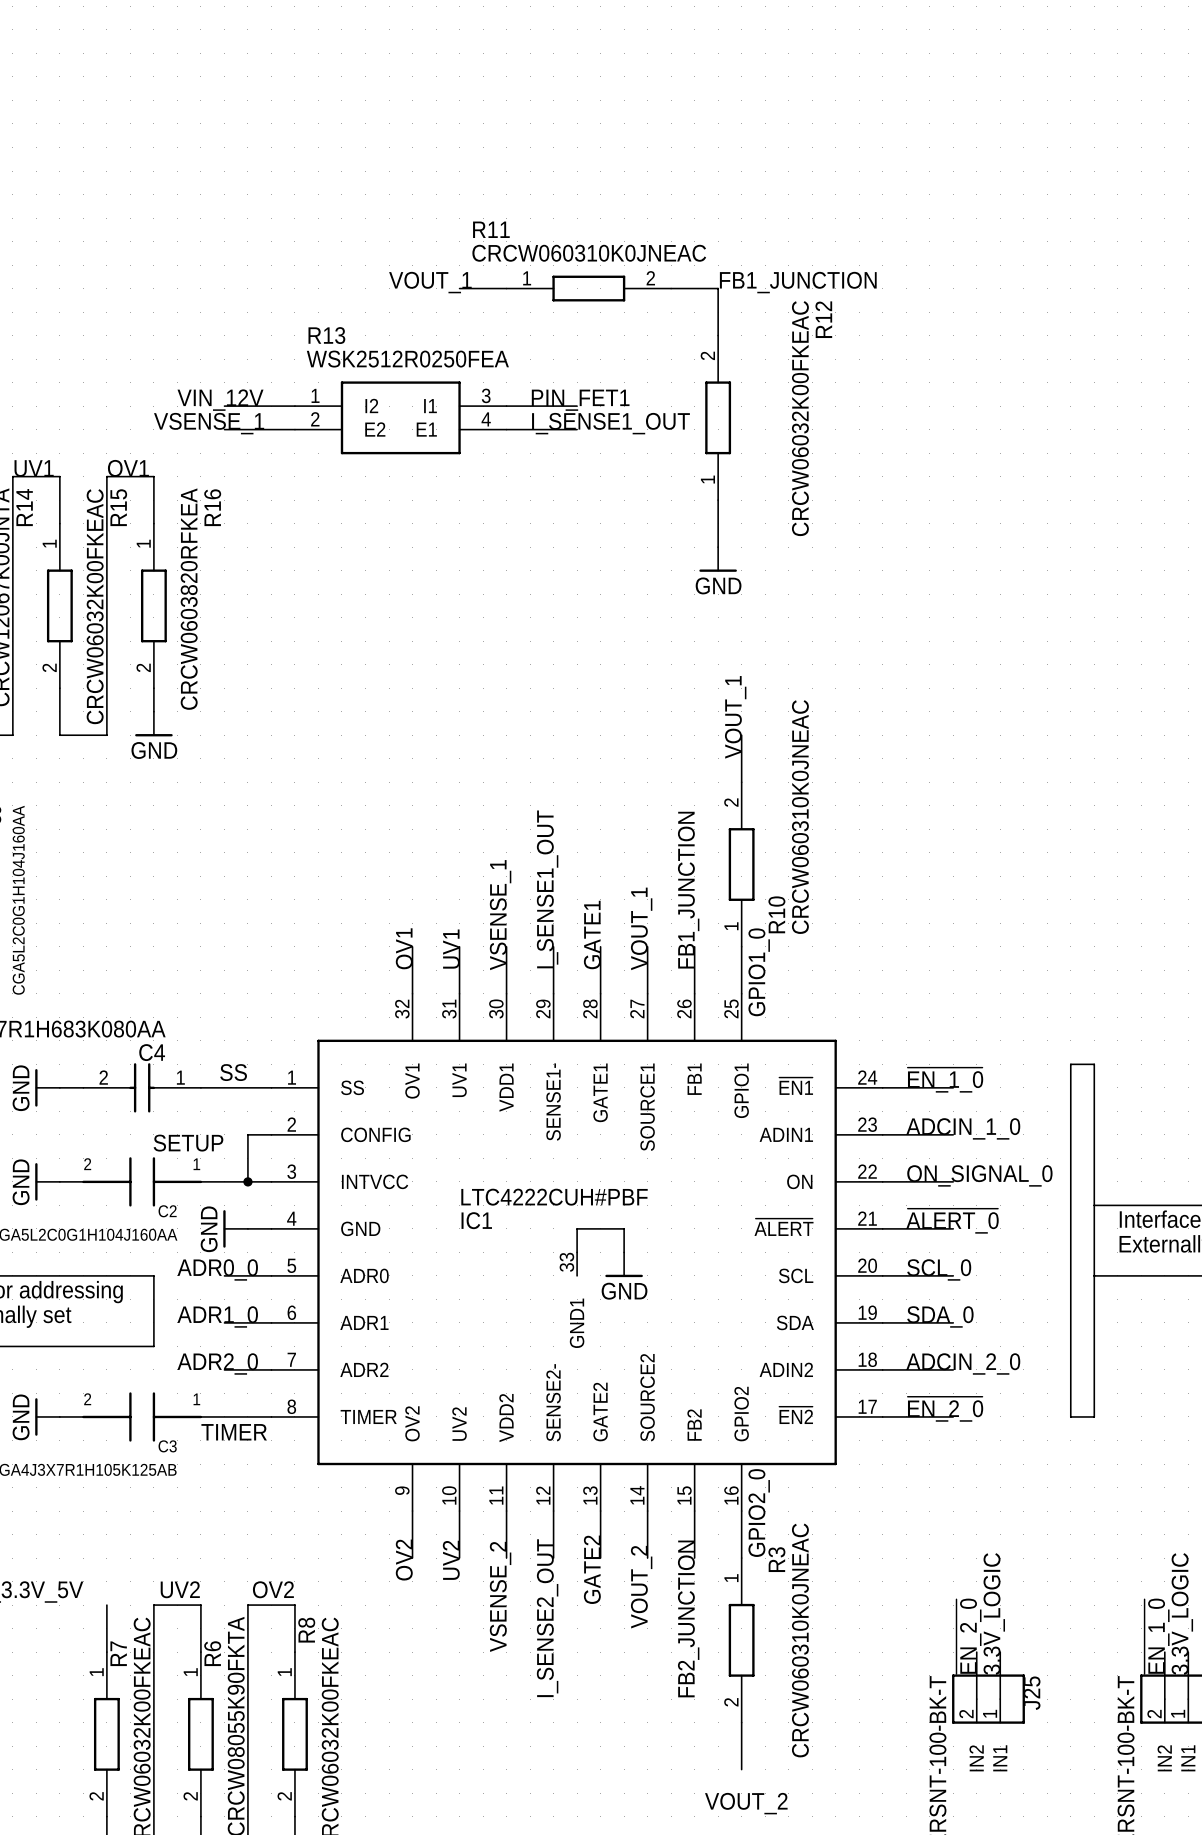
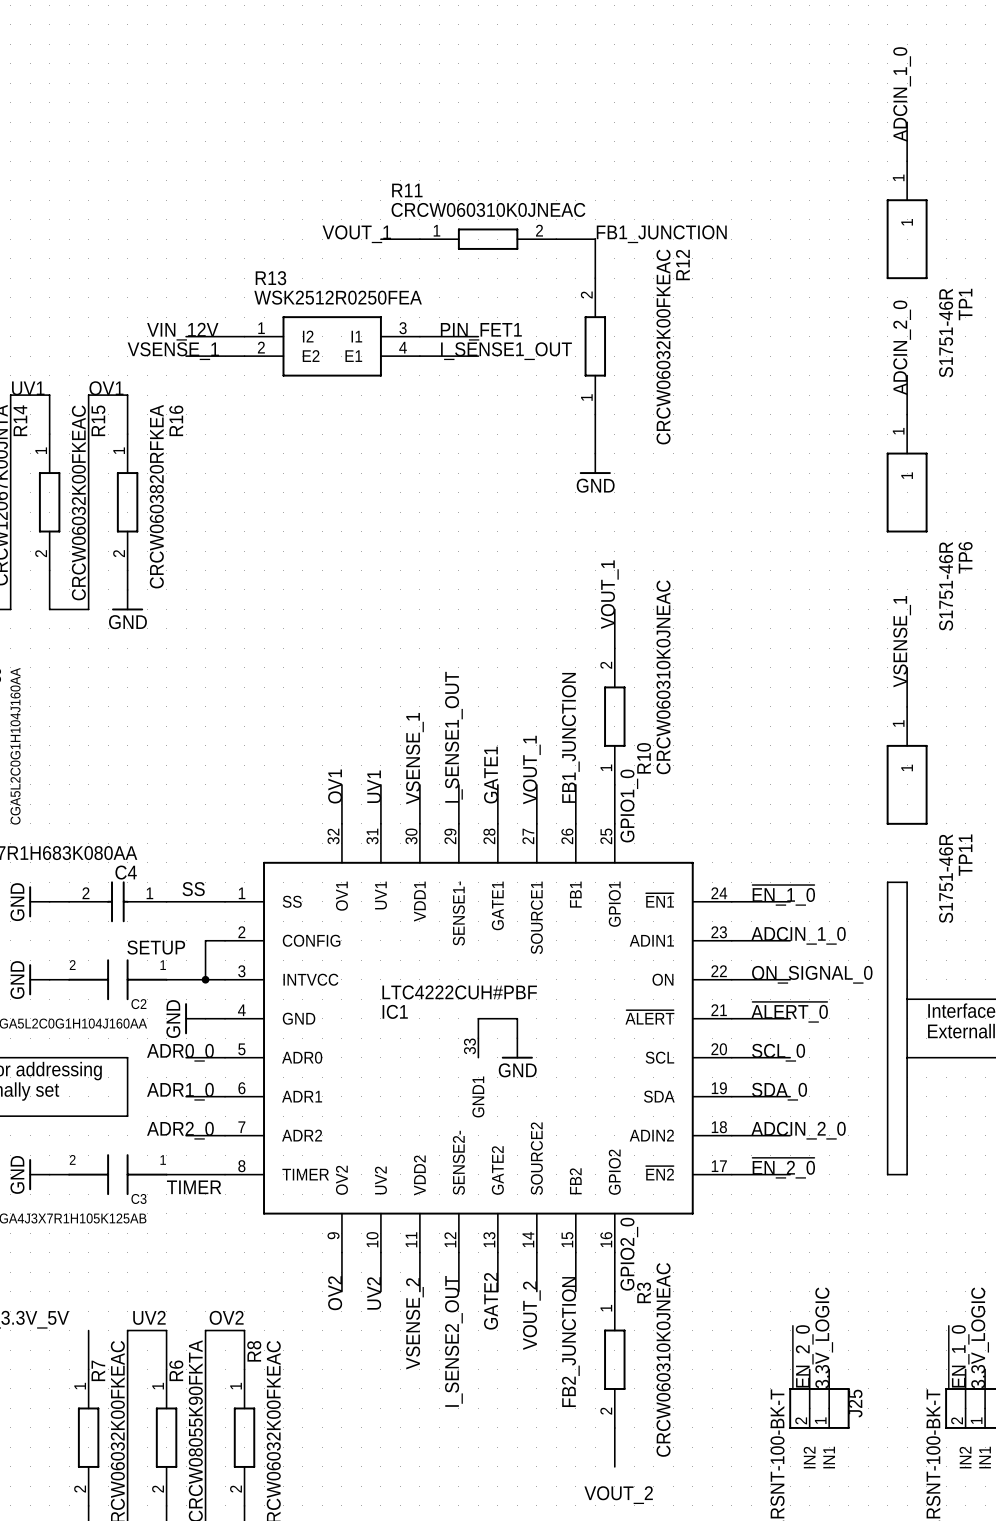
label: none -> ADCIN_1_0 (902, 94)
wire: none -> (907, 122) (907, 161)
TP1: none -> S1751-46R (907, 220)
label: none -> ADCIN_2_0 (902, 347)
wire: none -> (907, 375) (907, 414)
TP6: none -> S1751-46R (907, 473)
label: none -> VSENSE_1 (902, 641)
wire: none -> (907, 667) (907, 706)
TP11: none -> S1751-46R (907, 765)

